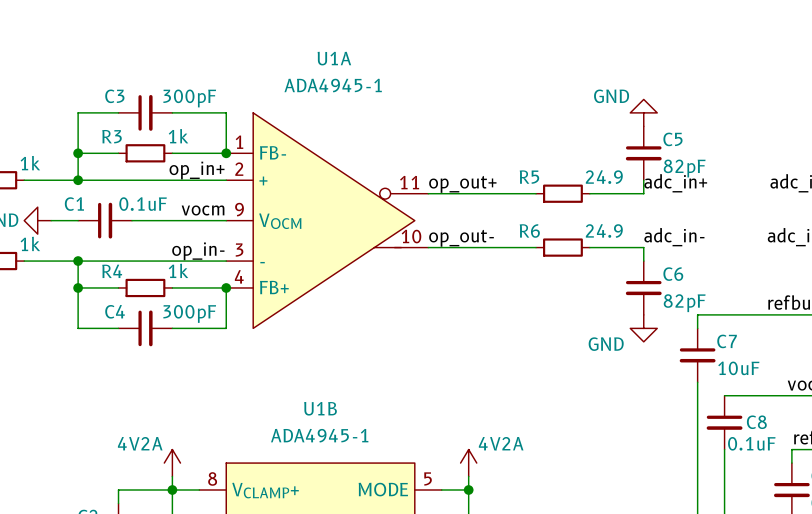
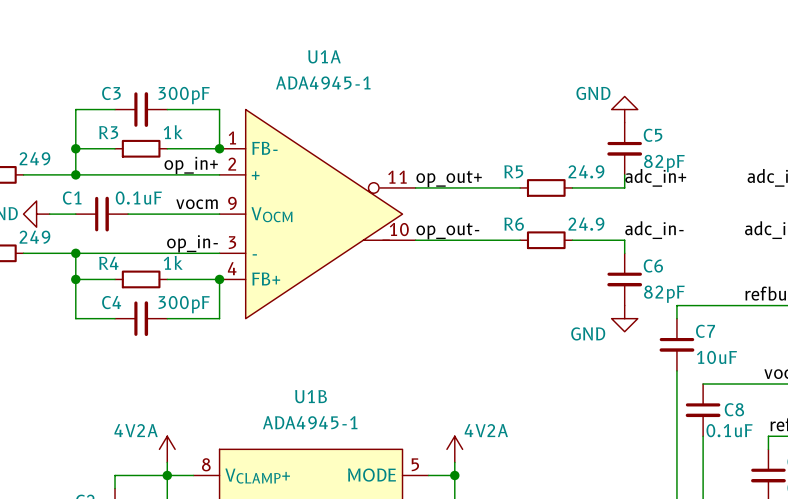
part value: 1k (30, 163) -> 249 (34, 158)
part value: 1k (30, 243) -> 249 (34, 237)

